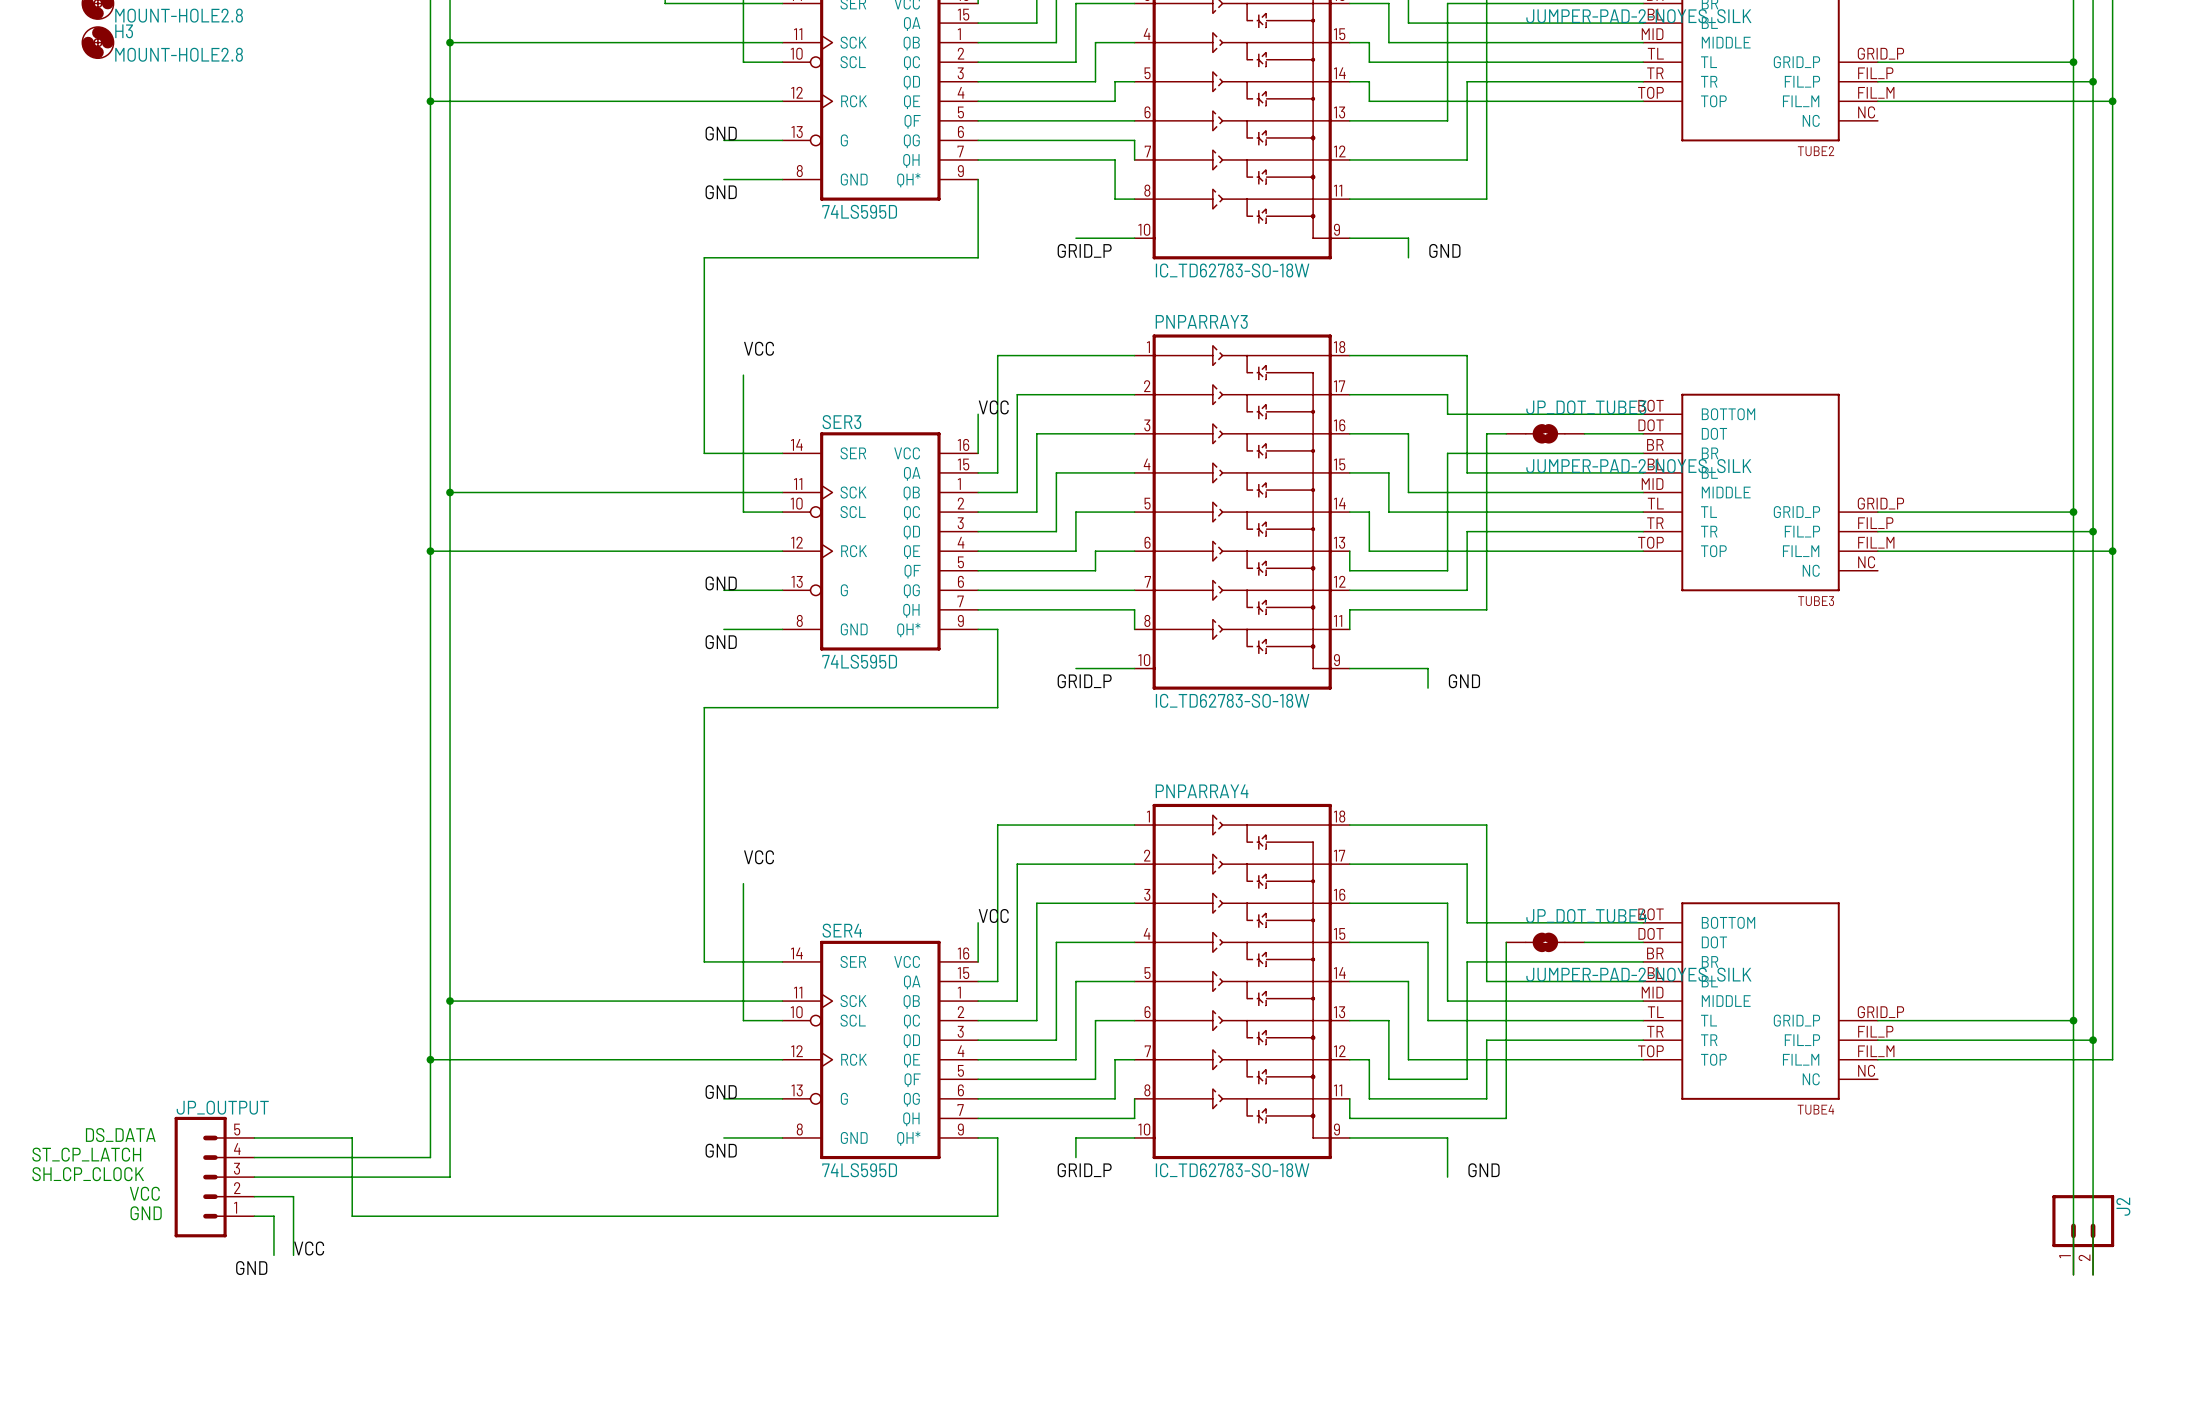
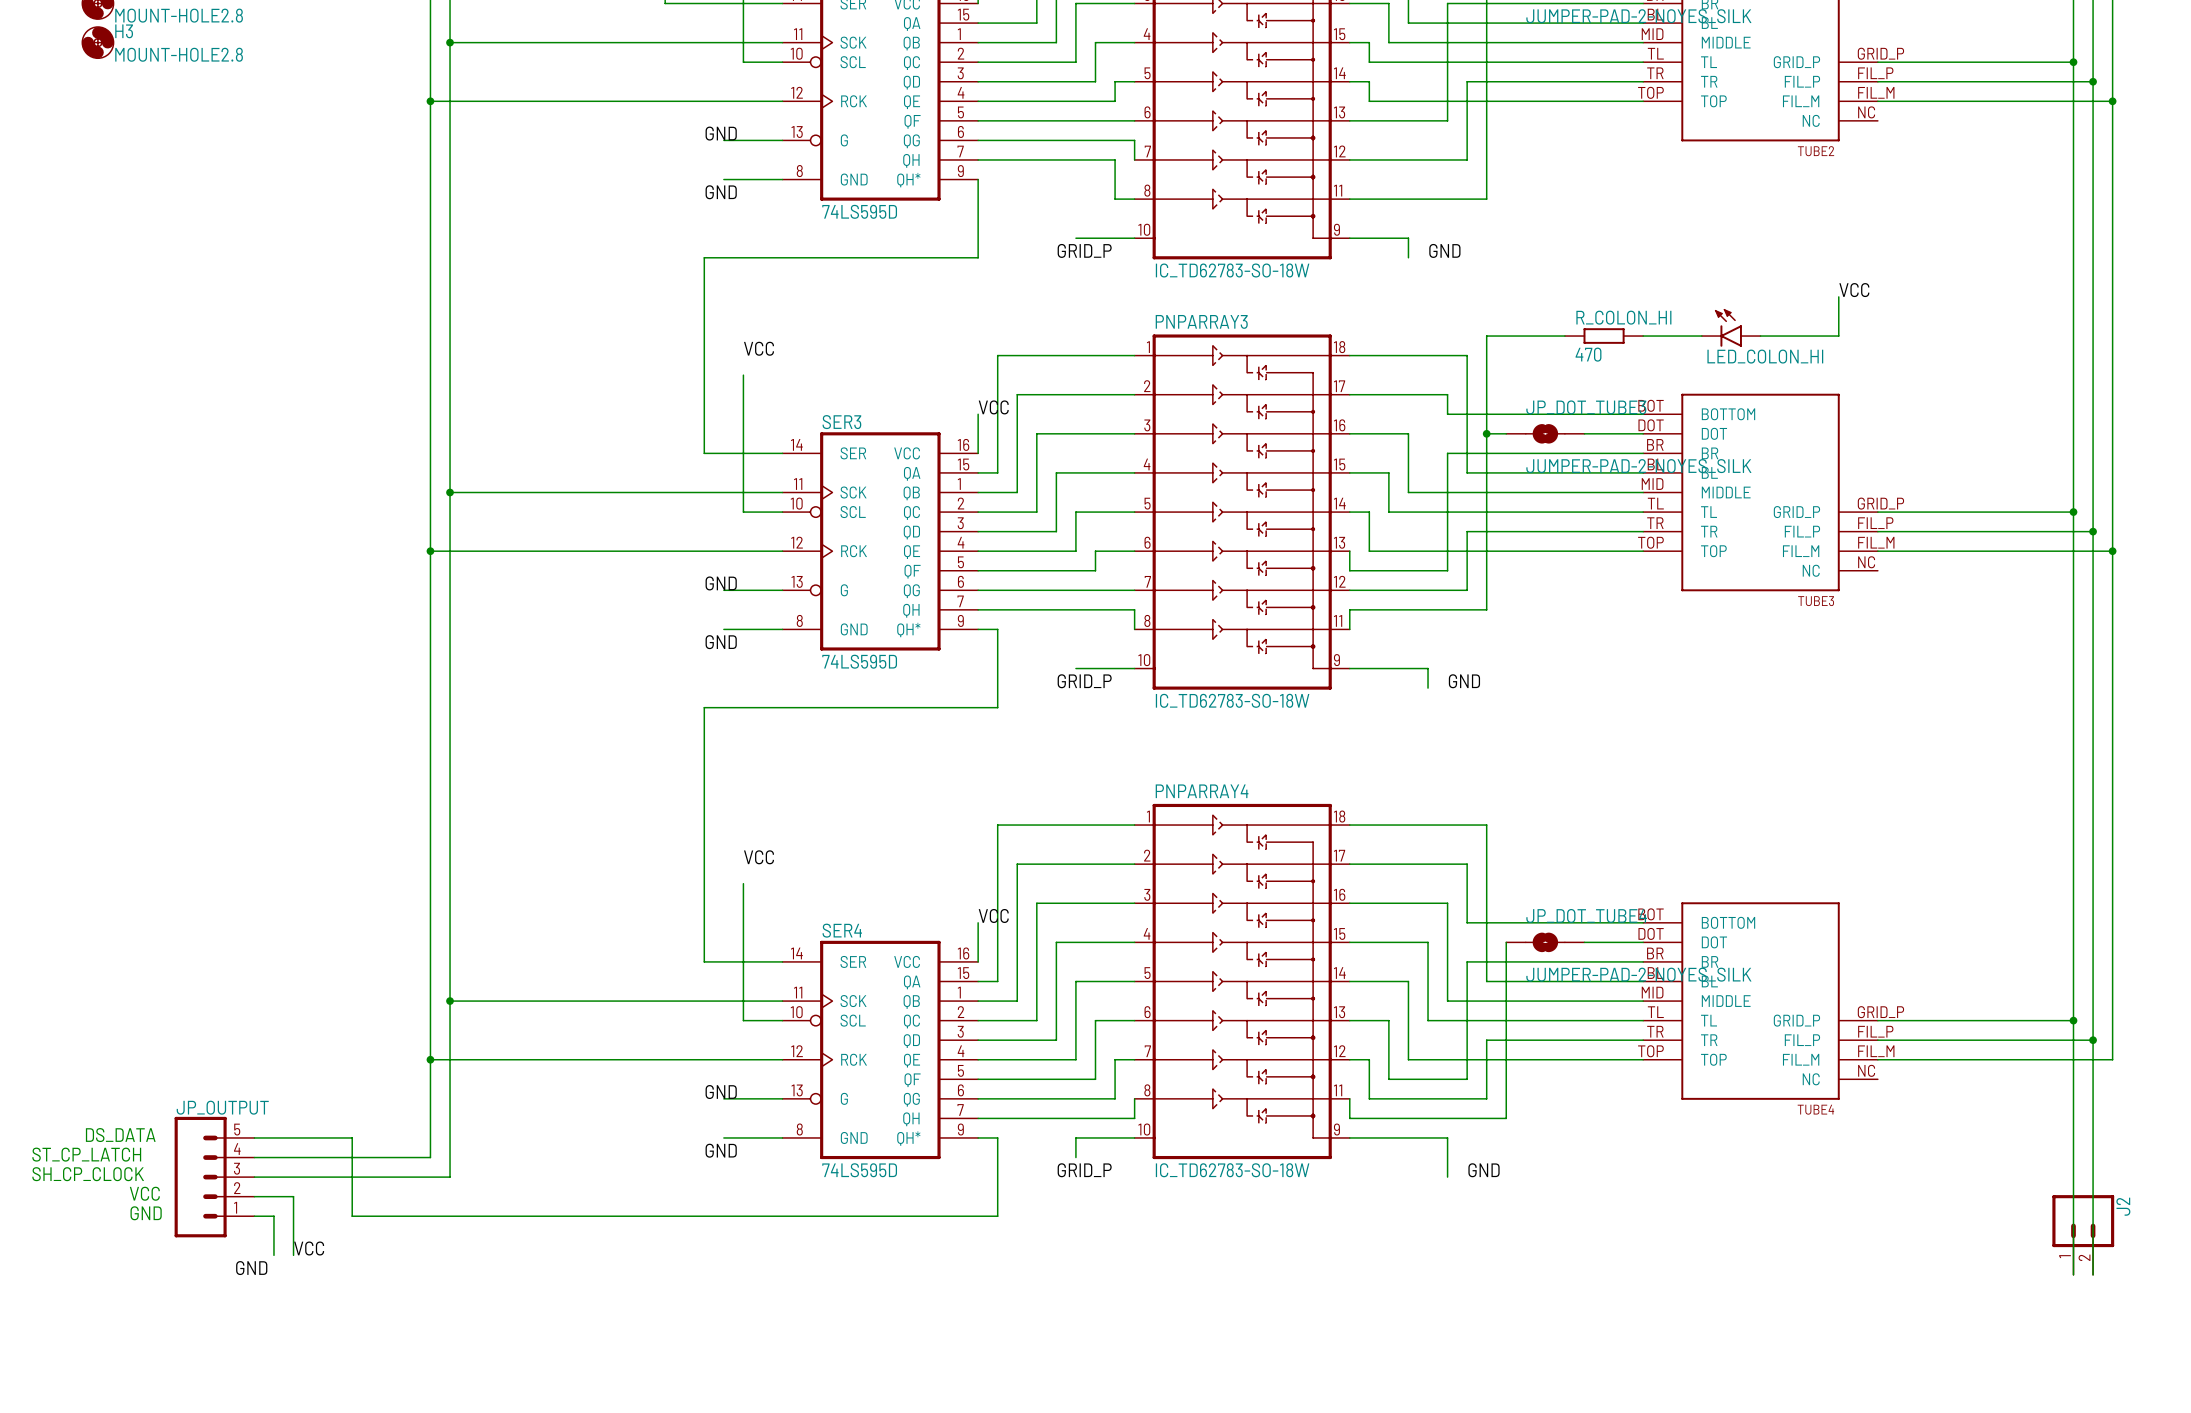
label: none -> VCC (1854, 290)
wire: none -> (1838, 296) (1838, 336) (1760, 336)
LED_COLON_HI: none -> (1731, 327)
wire: none -> (1564, 336) (1486, 336) (1486, 433)
R_COLON_HI: none -> 470 (1604, 336)
wire: none -> (1643, 336) (1701, 336)
junction: none -> (1486, 433)

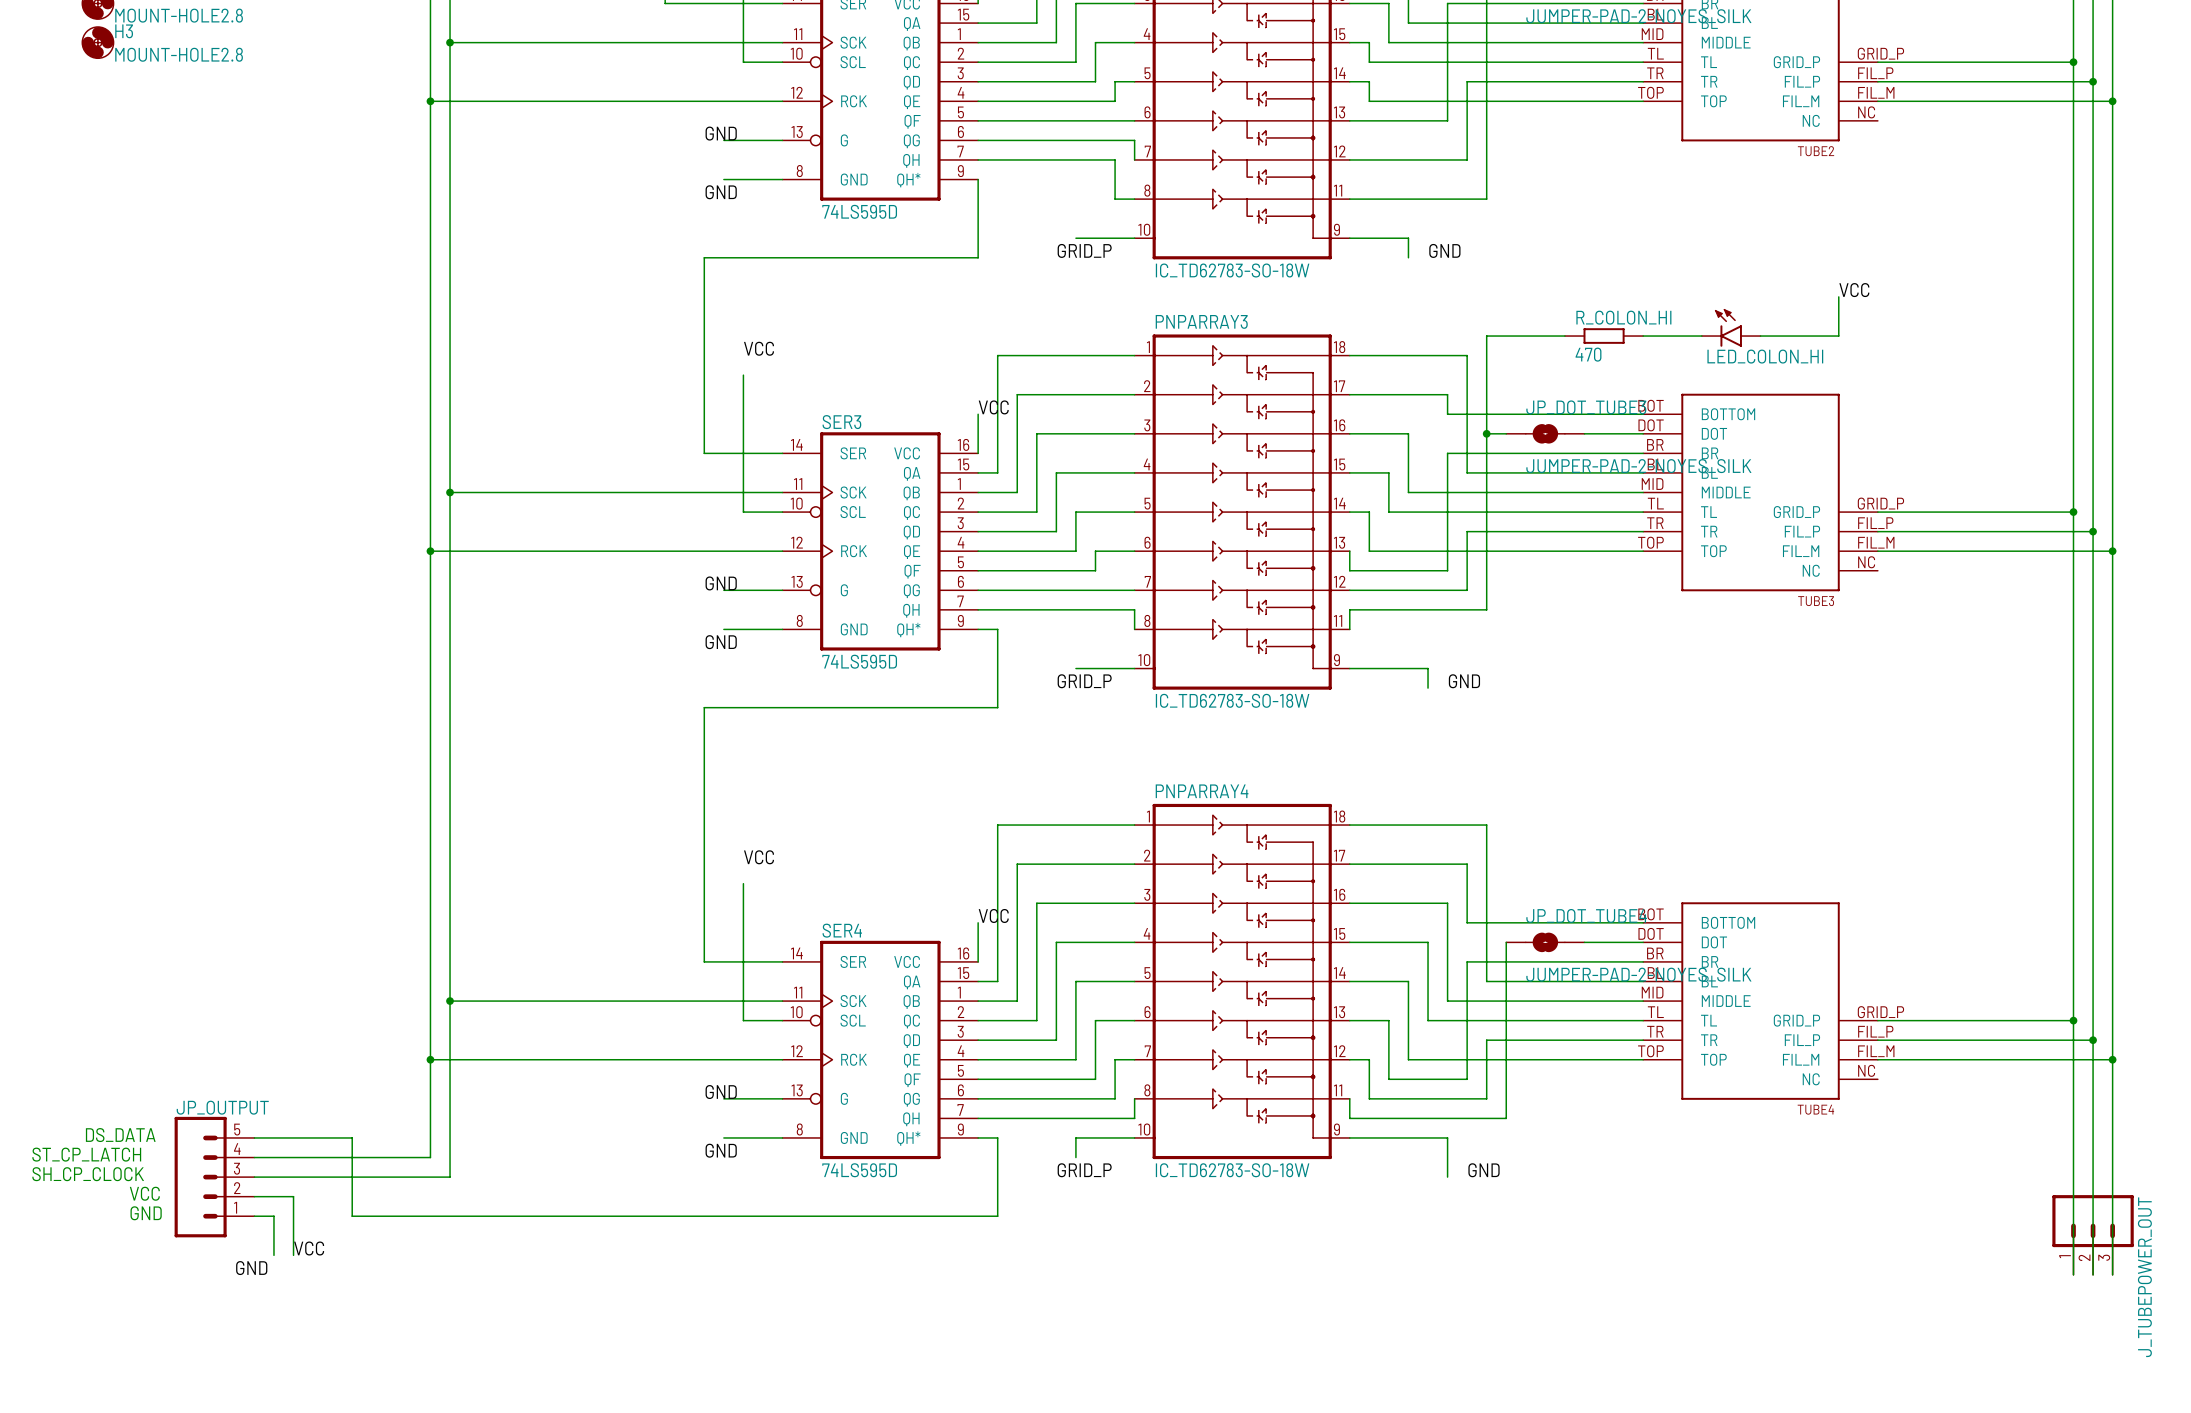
wire: none -> (2112, 1059) (2112, 1274)
junction: none -> (2112, 1059)
J2: (2083, 1235) -> none
J_TUBEPOWER_OUT: none -> (2093, 1235)

